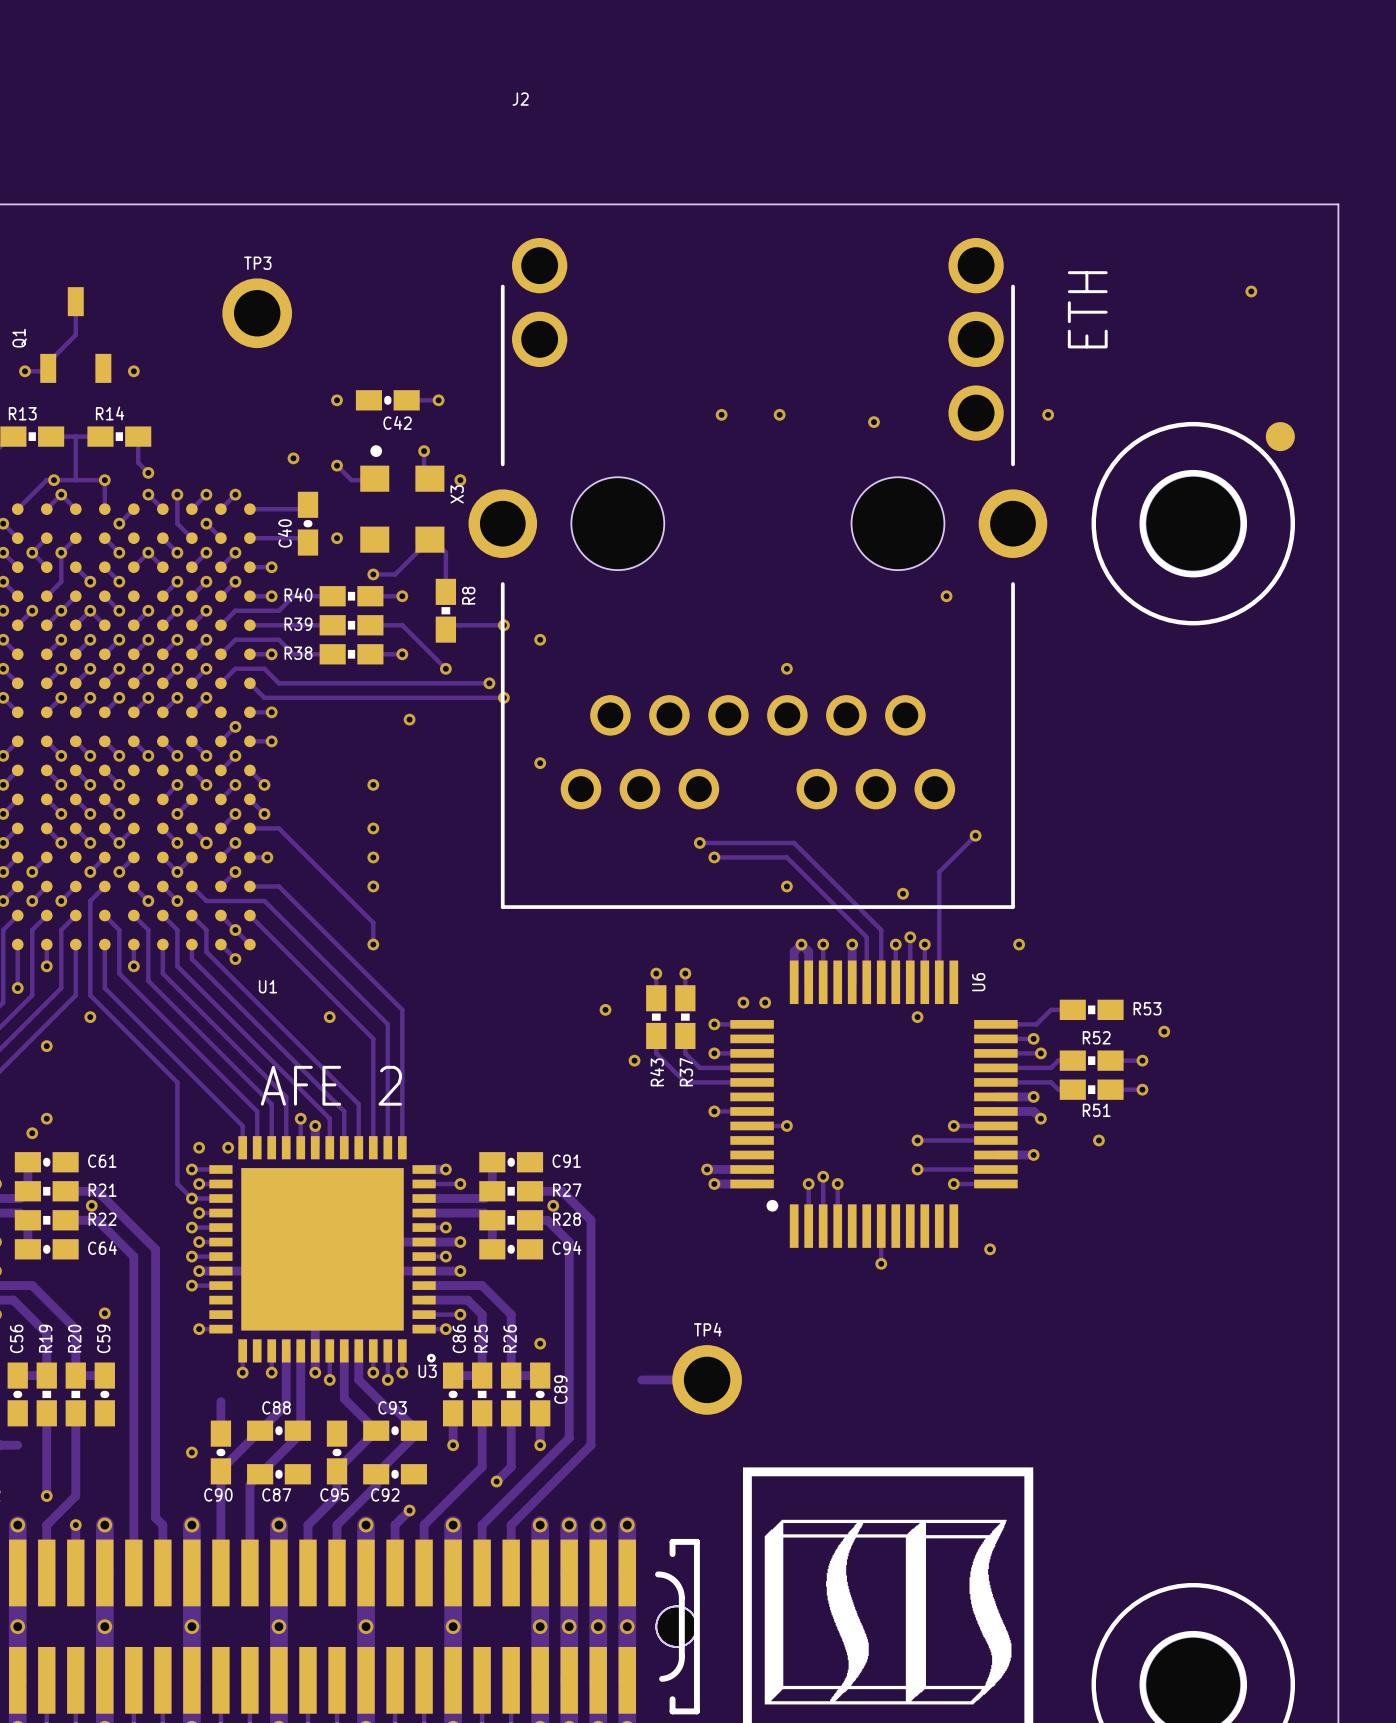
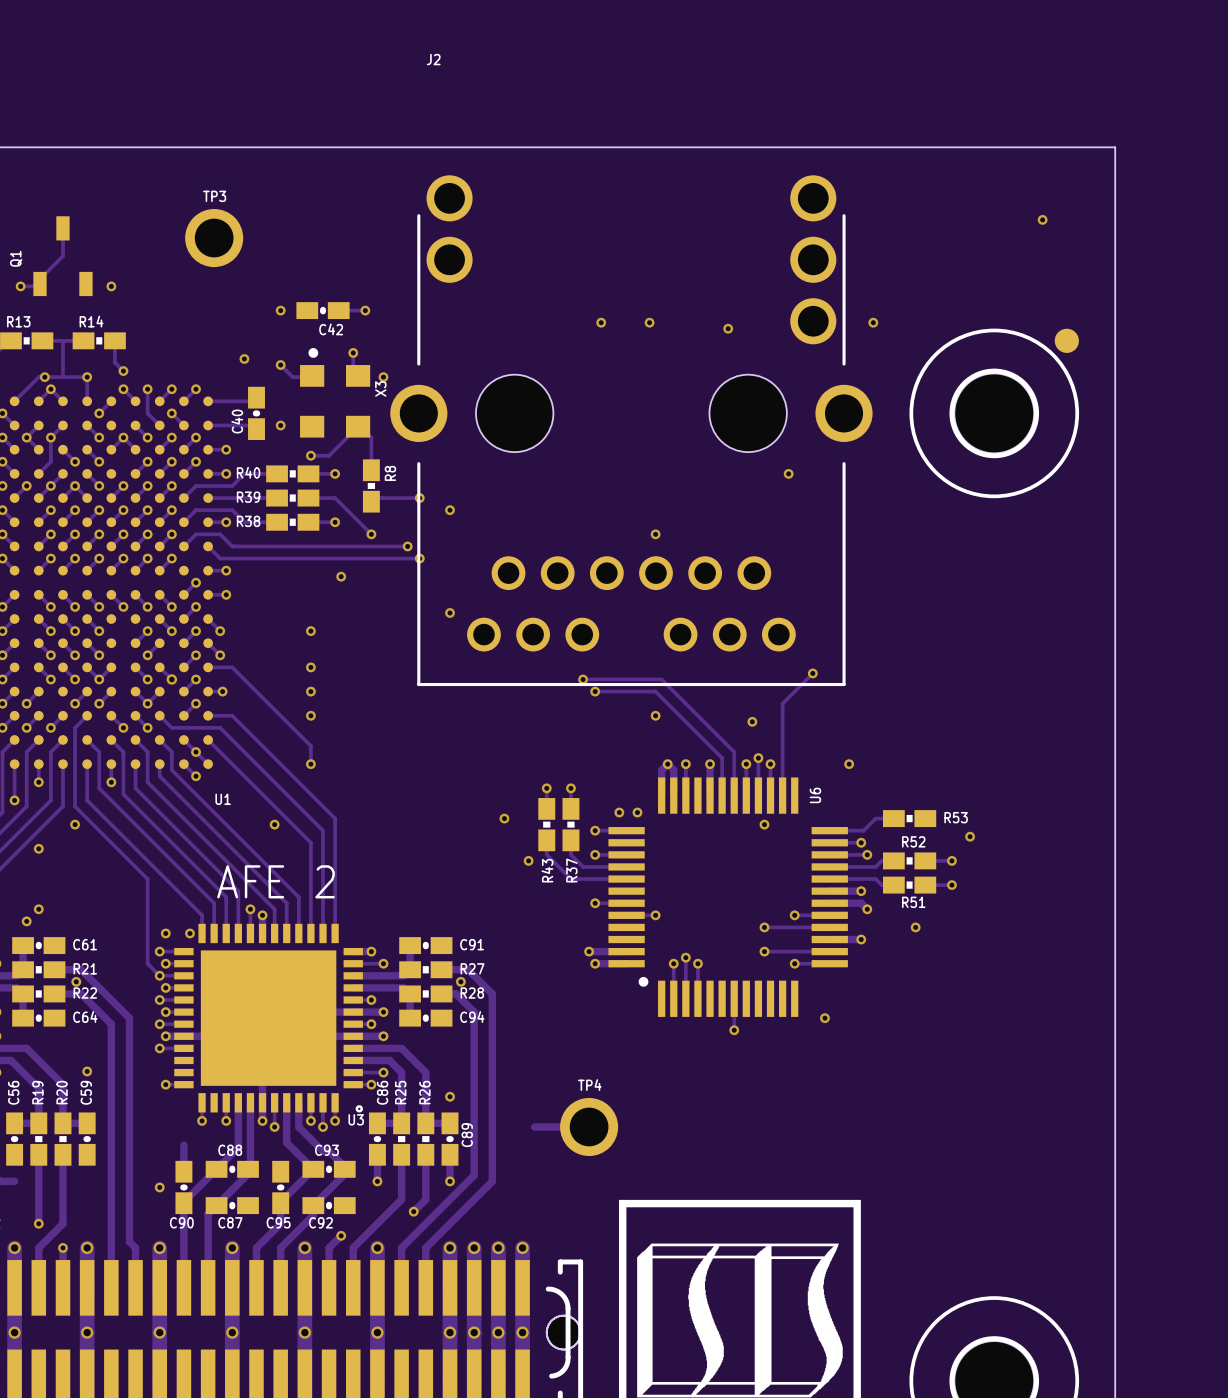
J2 footprint: [468, 237, 1048, 909] -> [390, 175, 873, 687]
text: ETH (1087, 309) -> none

